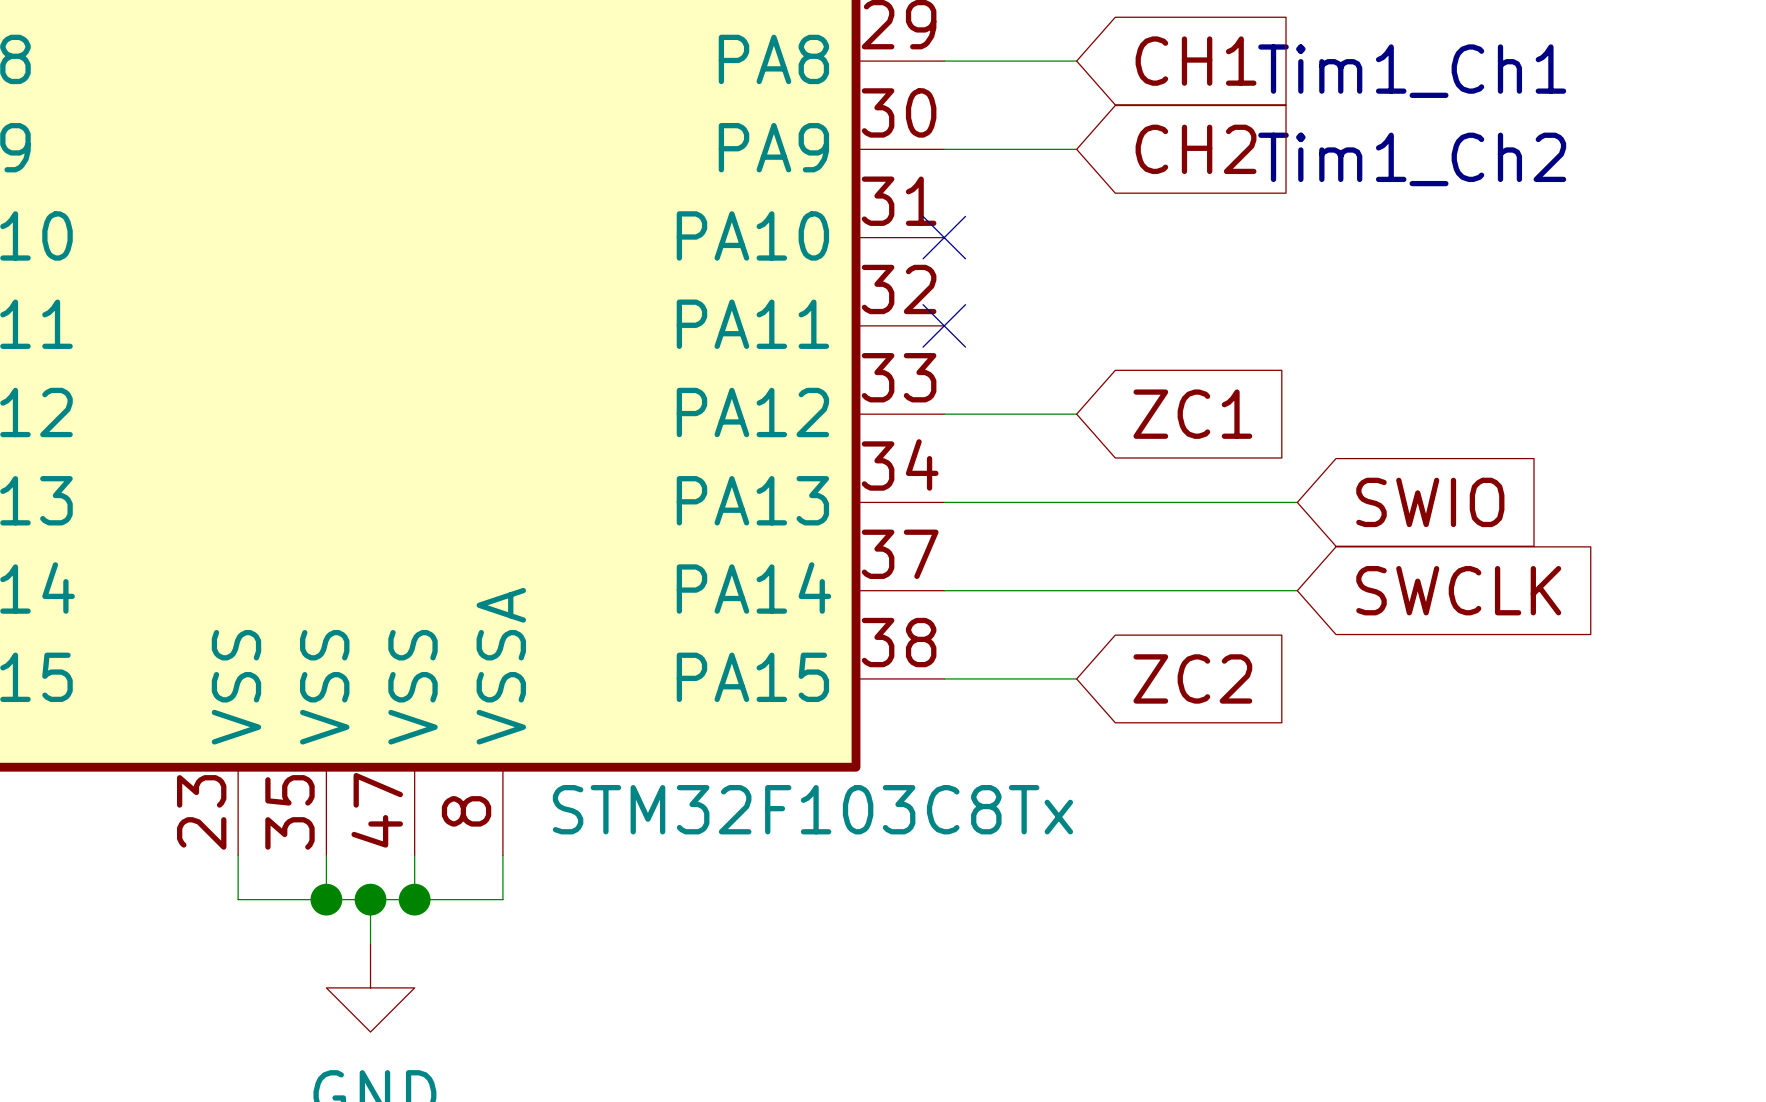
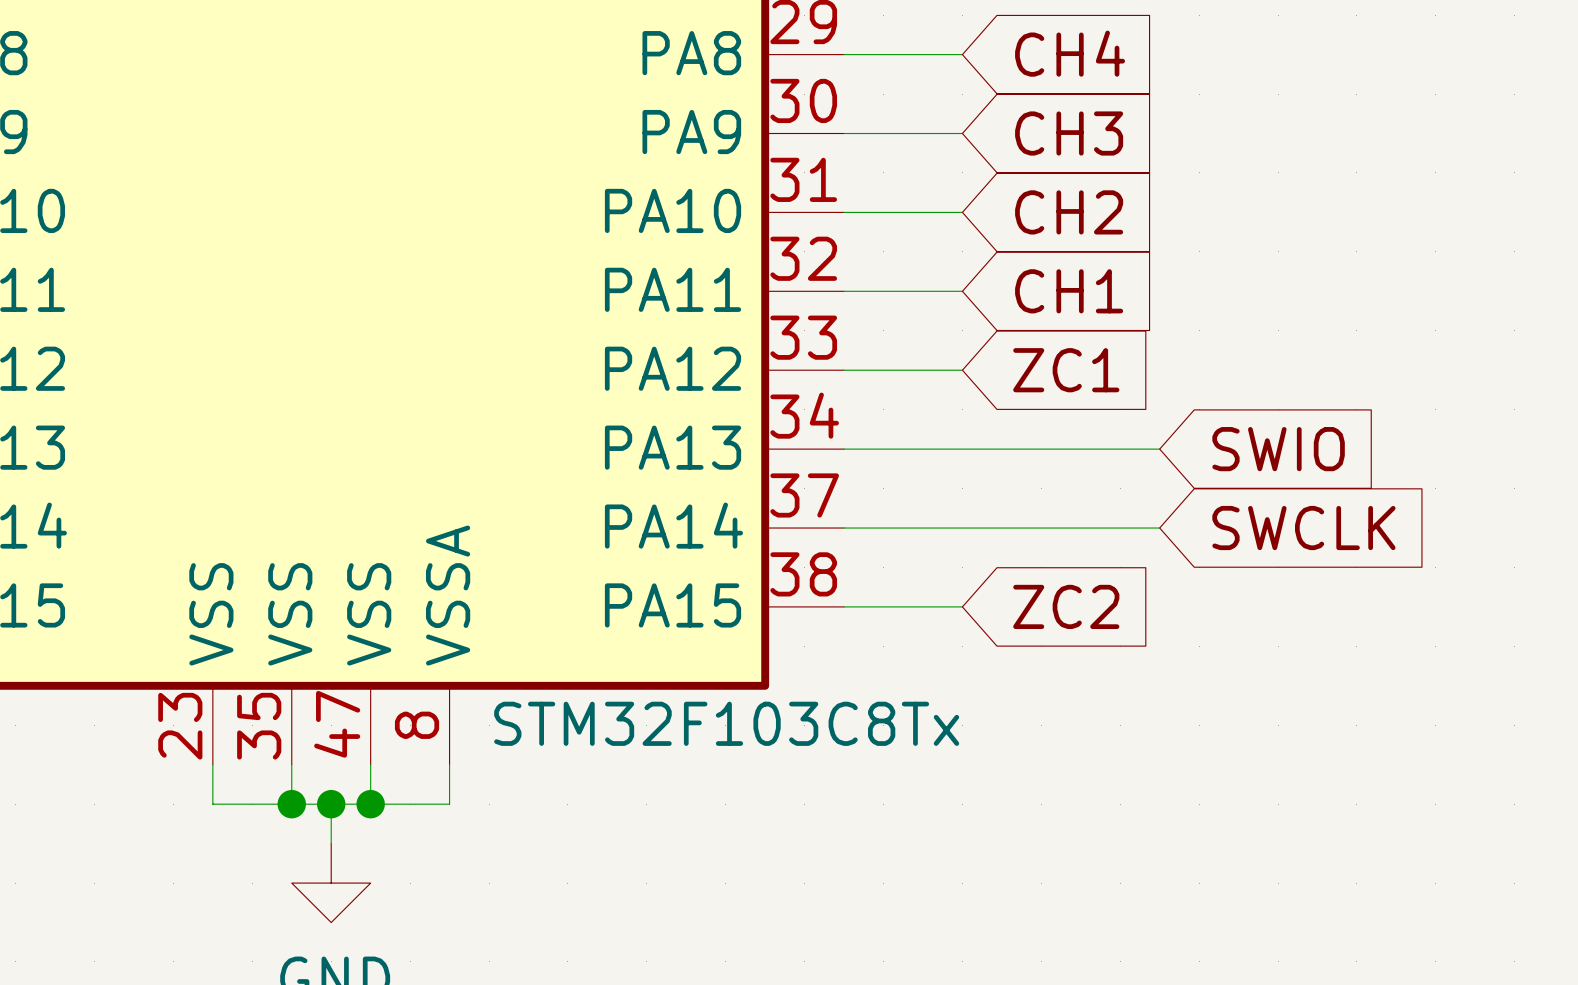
global label: CH1 (1196, 61) -> CH4 (1070, 53)
text: Tim1_Ch1 (1412, 71) -> none
global label: CH2 (1196, 149) -> CH3 (1069, 133)
text: Tim1_Ch2 (1412, 159) -> none
wire: none -> (844, 212) (962, 212)
no-connect mark: (944, 237) -> none
global label: none -> CH2 (1069, 212)
wire: none -> (844, 291) (962, 291)
no-connect mark: (944, 325) -> none
global label: none -> CH1 (1069, 291)

